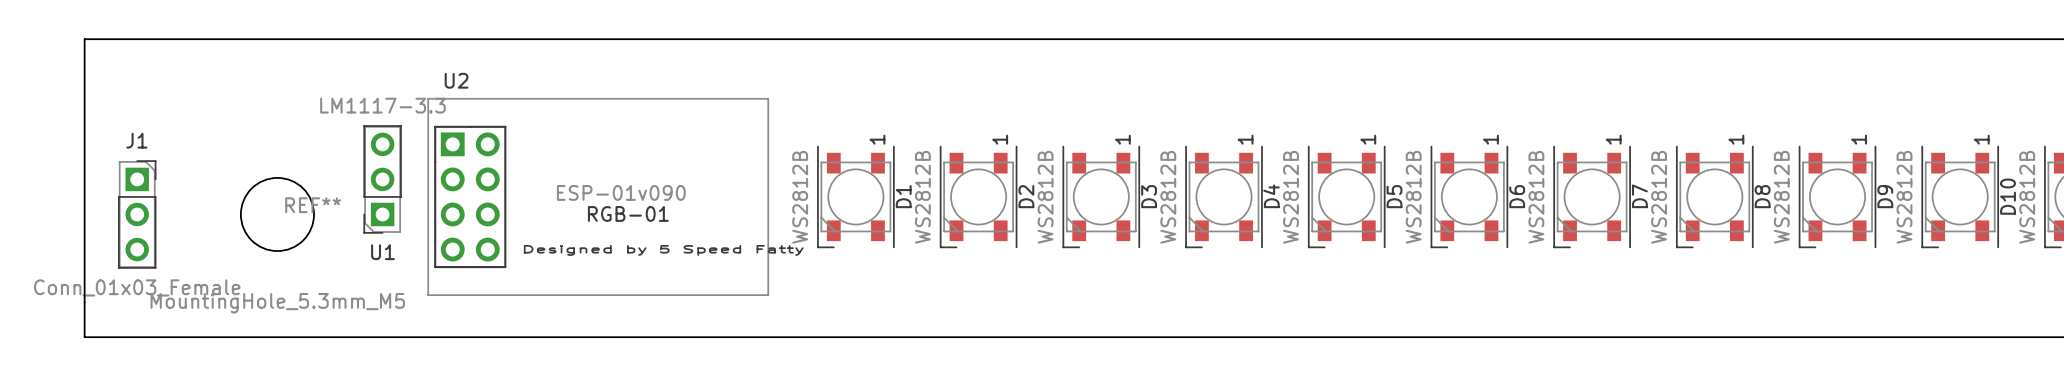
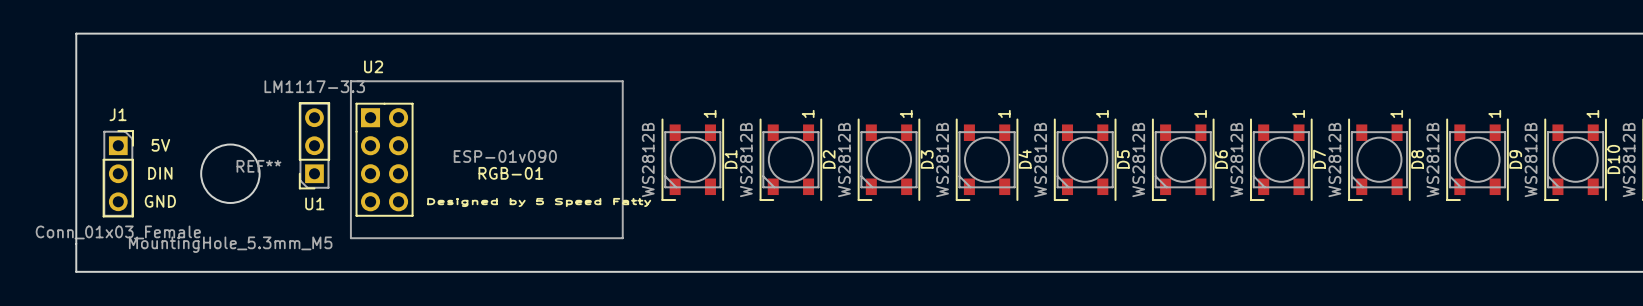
text: none -> 5V (160, 145)
text: none -> DIN (160, 173)
text: none -> GND (160, 201)

